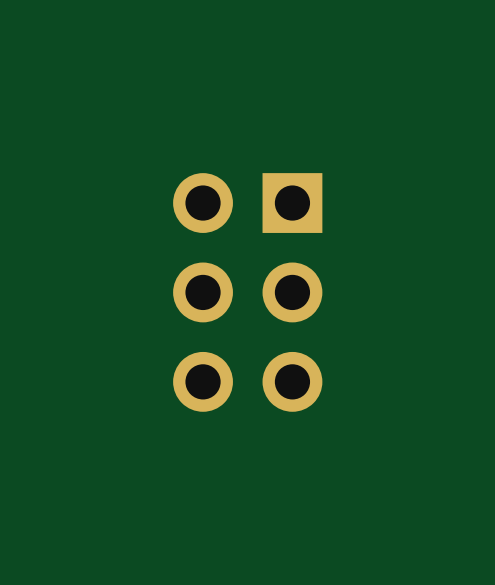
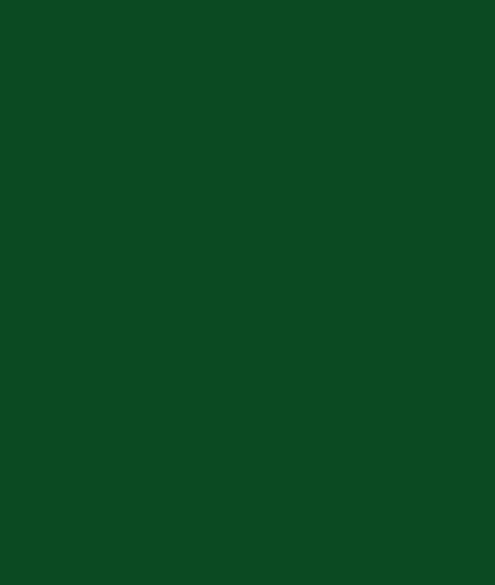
part: (247, 292) -> none

